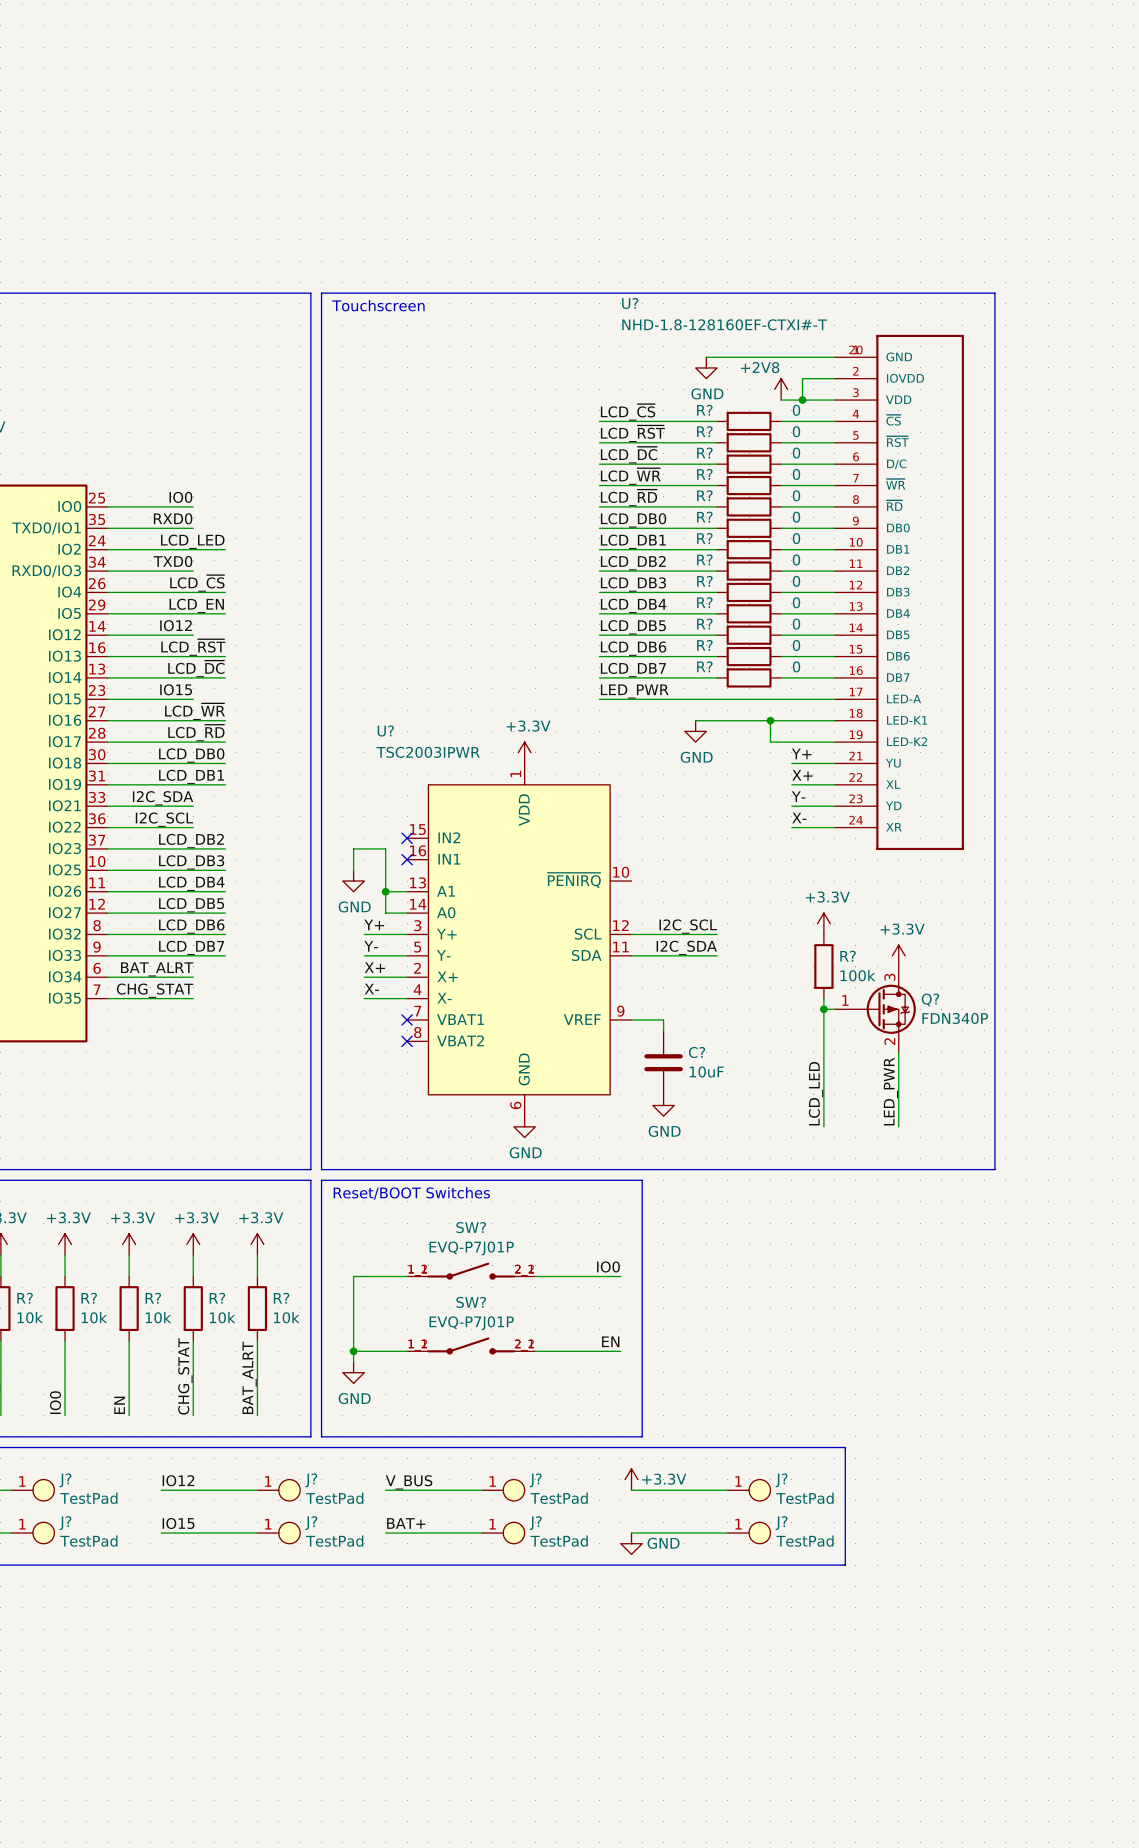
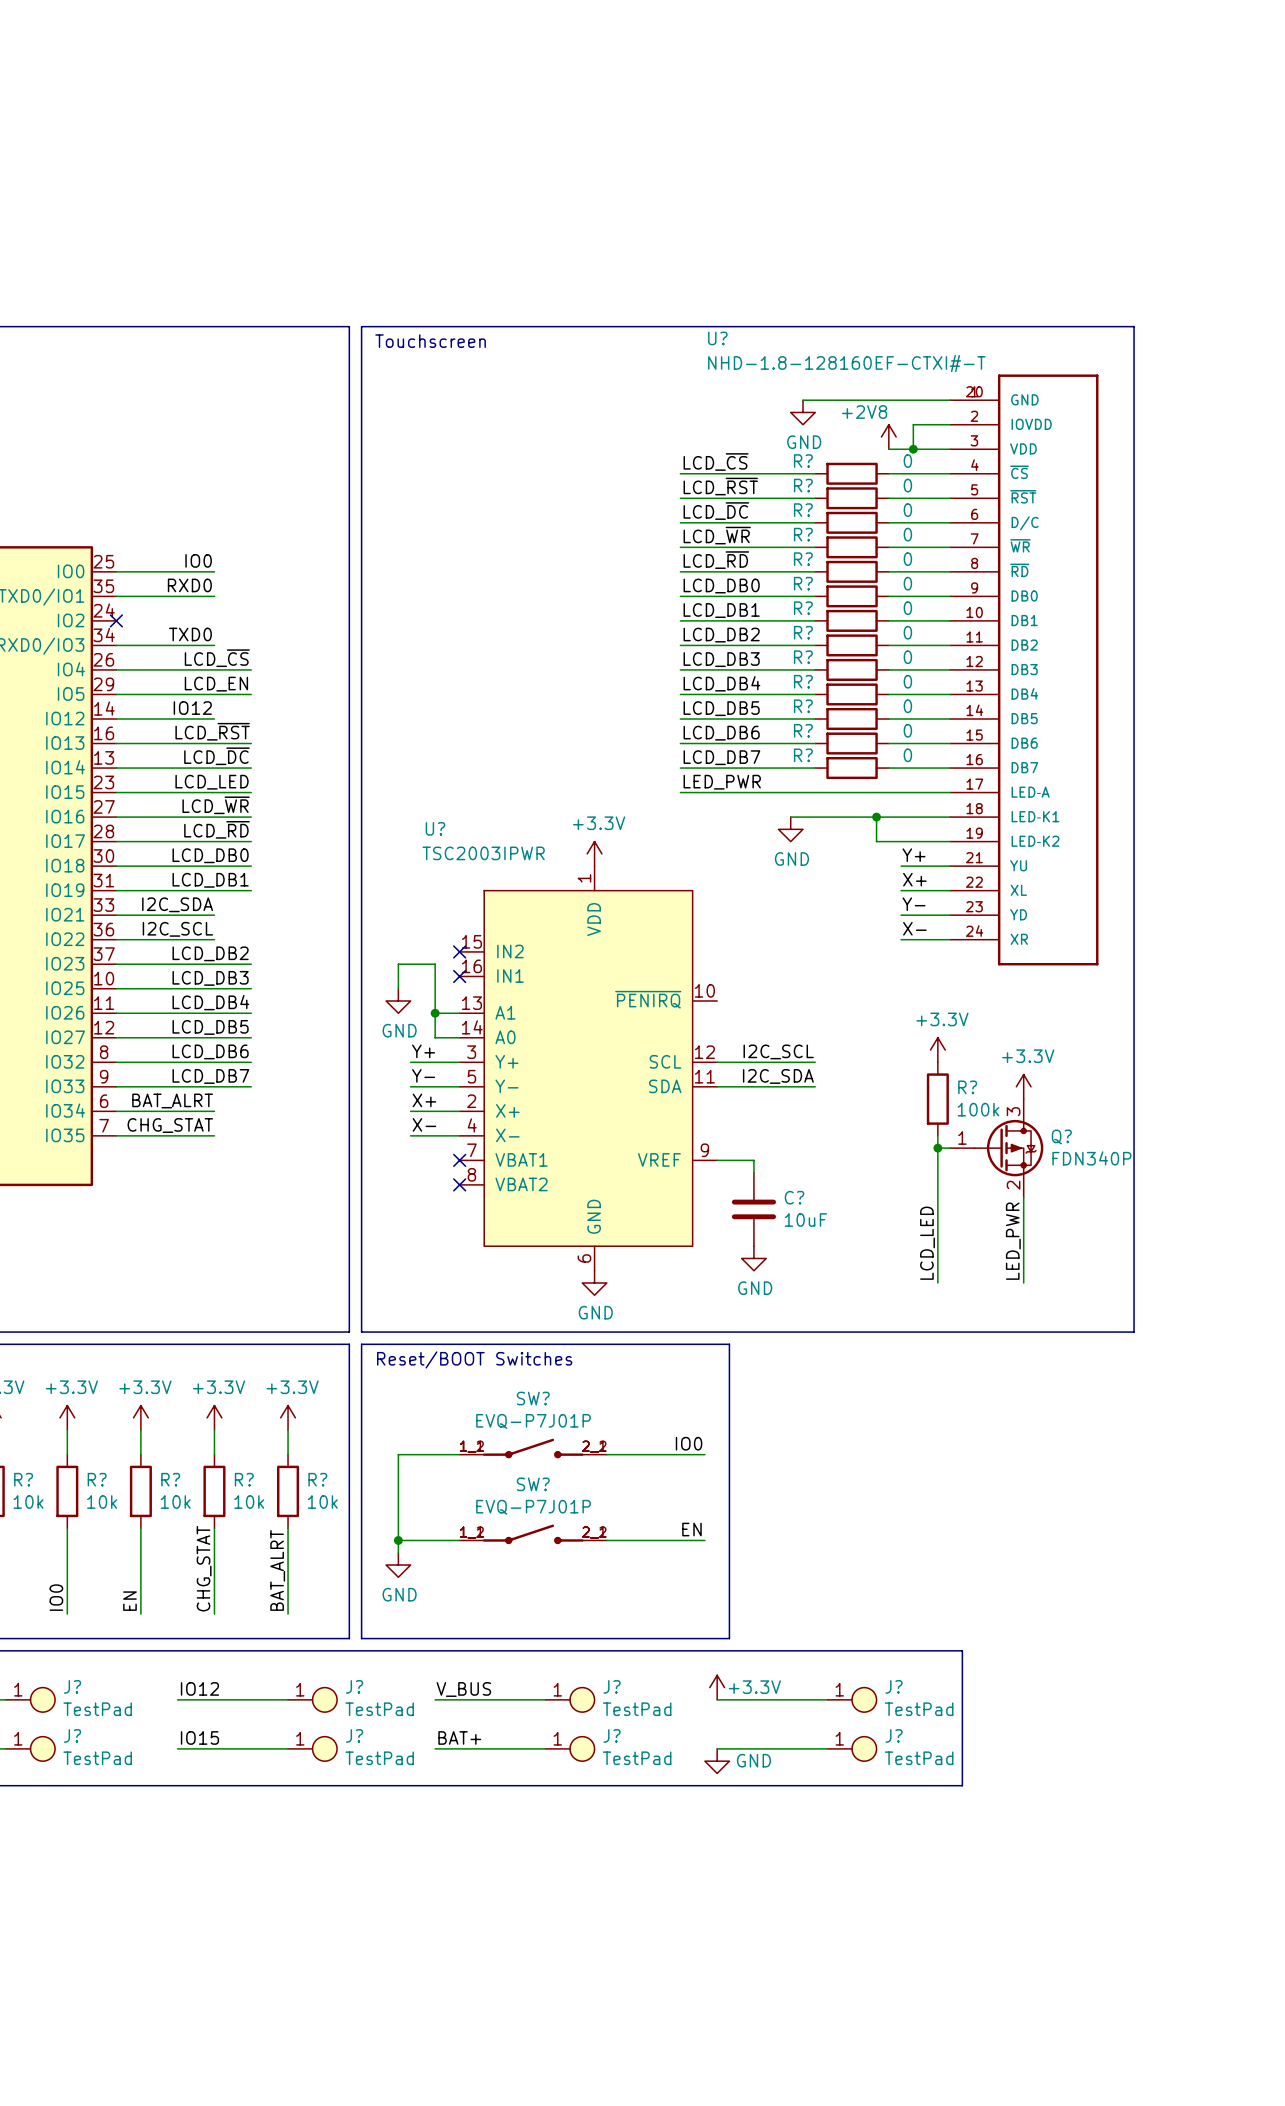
label position: LCD_LED (192, 541) -> LCD_LED (212, 782)
wire: (107, 549) (225, 549) -> none
no-connect mark: none -> (116, 620)
label: IO15 (176, 689) -> none
wire: none -> (214, 792) (251, 792)

